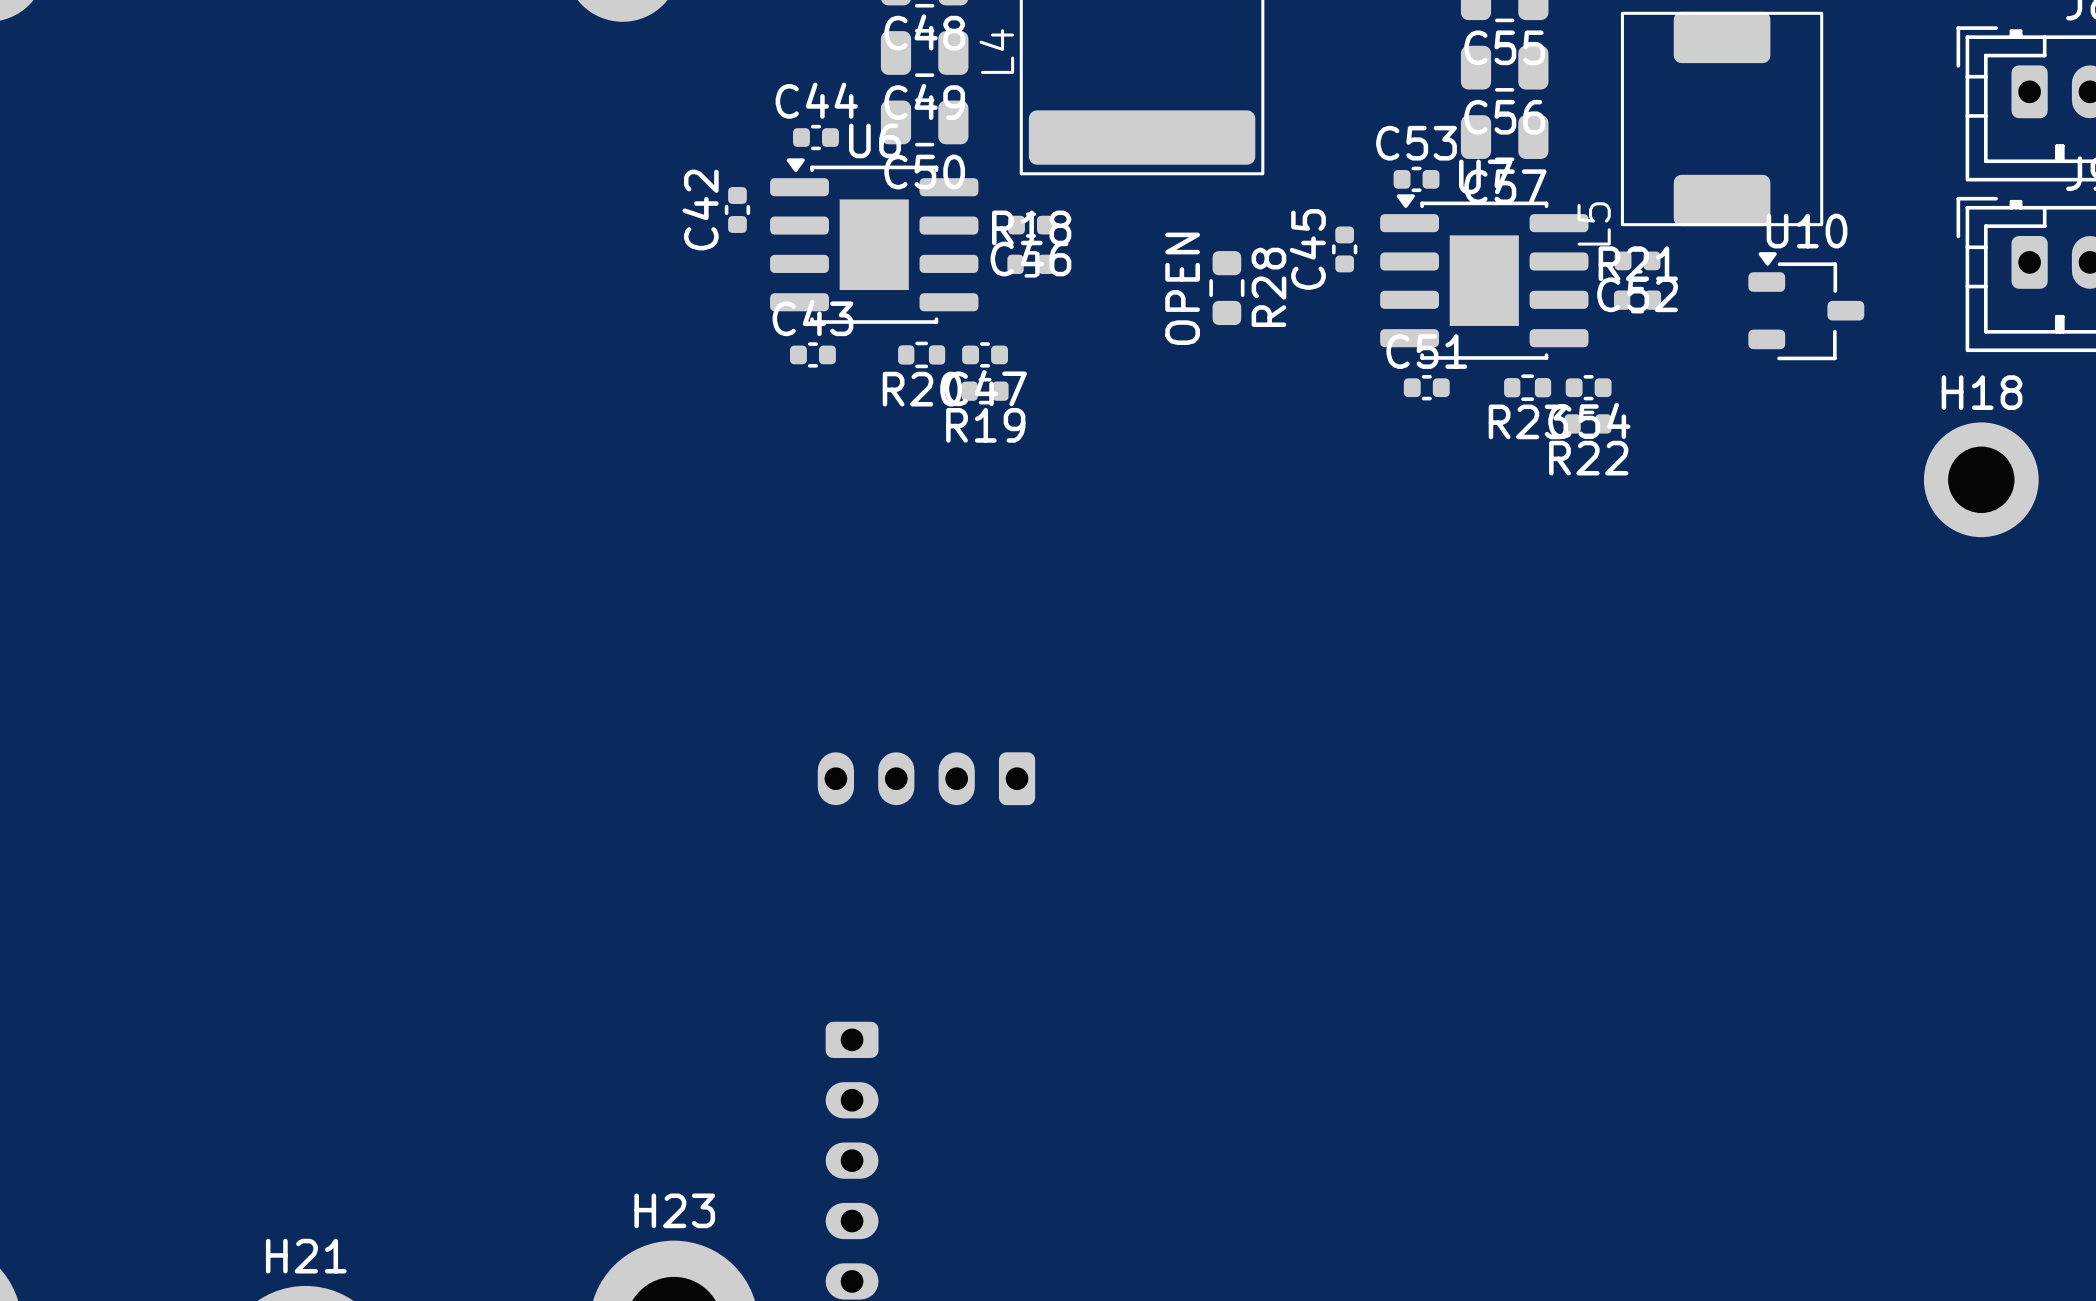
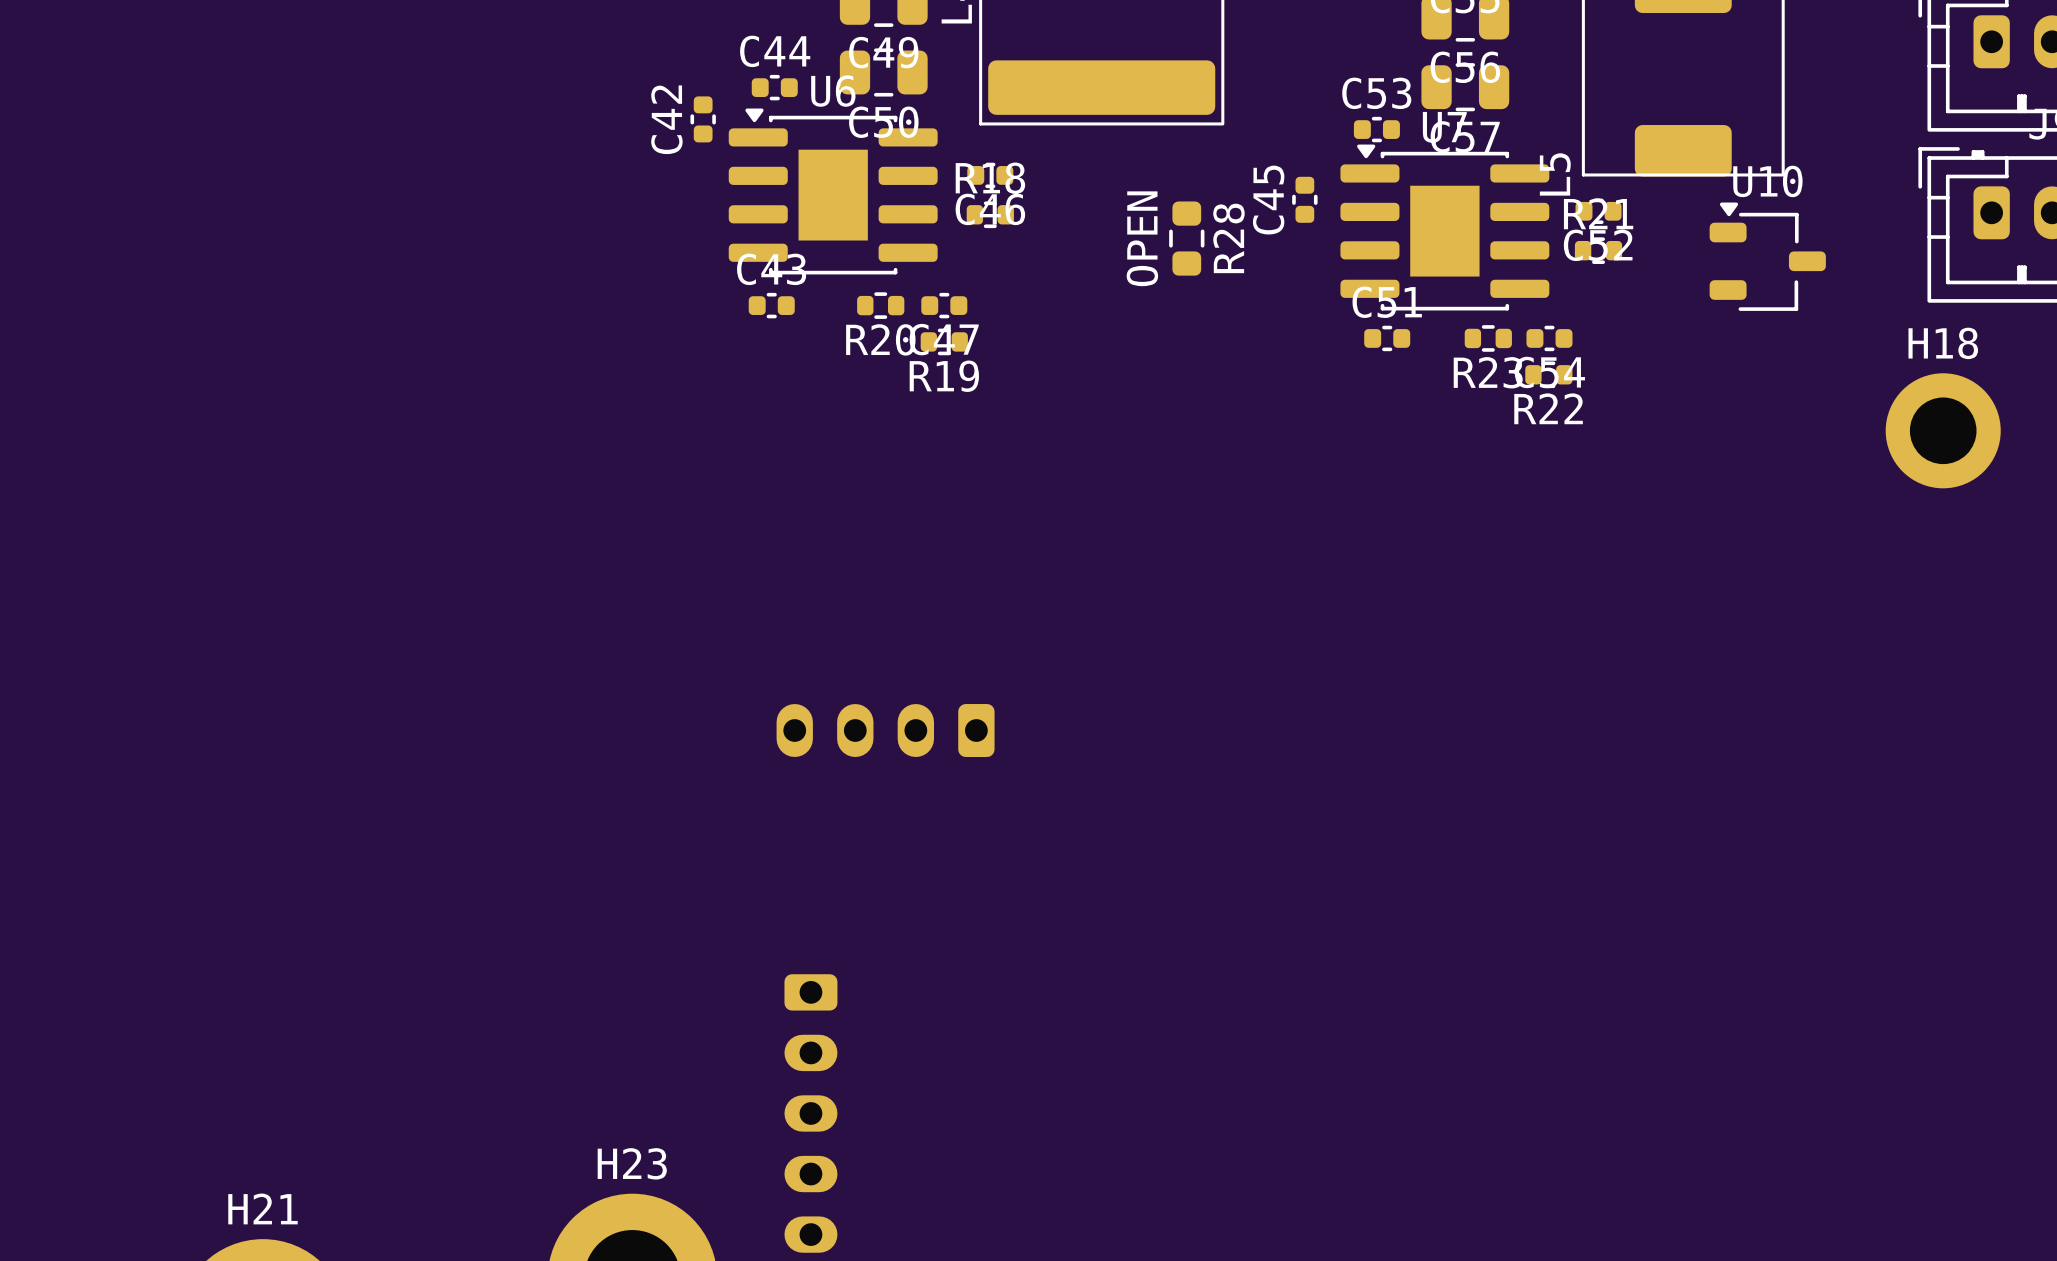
C42 position: (737, 210) -> (703, 119)

